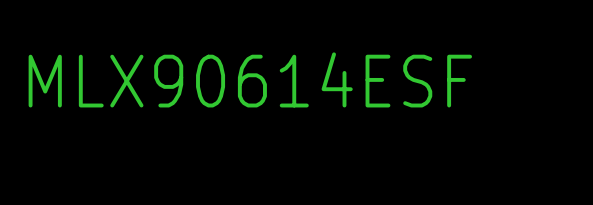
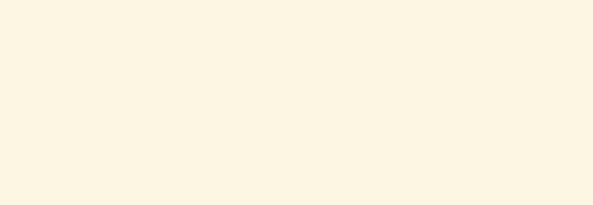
text: MLX90614ESF (250, 79) -> none

